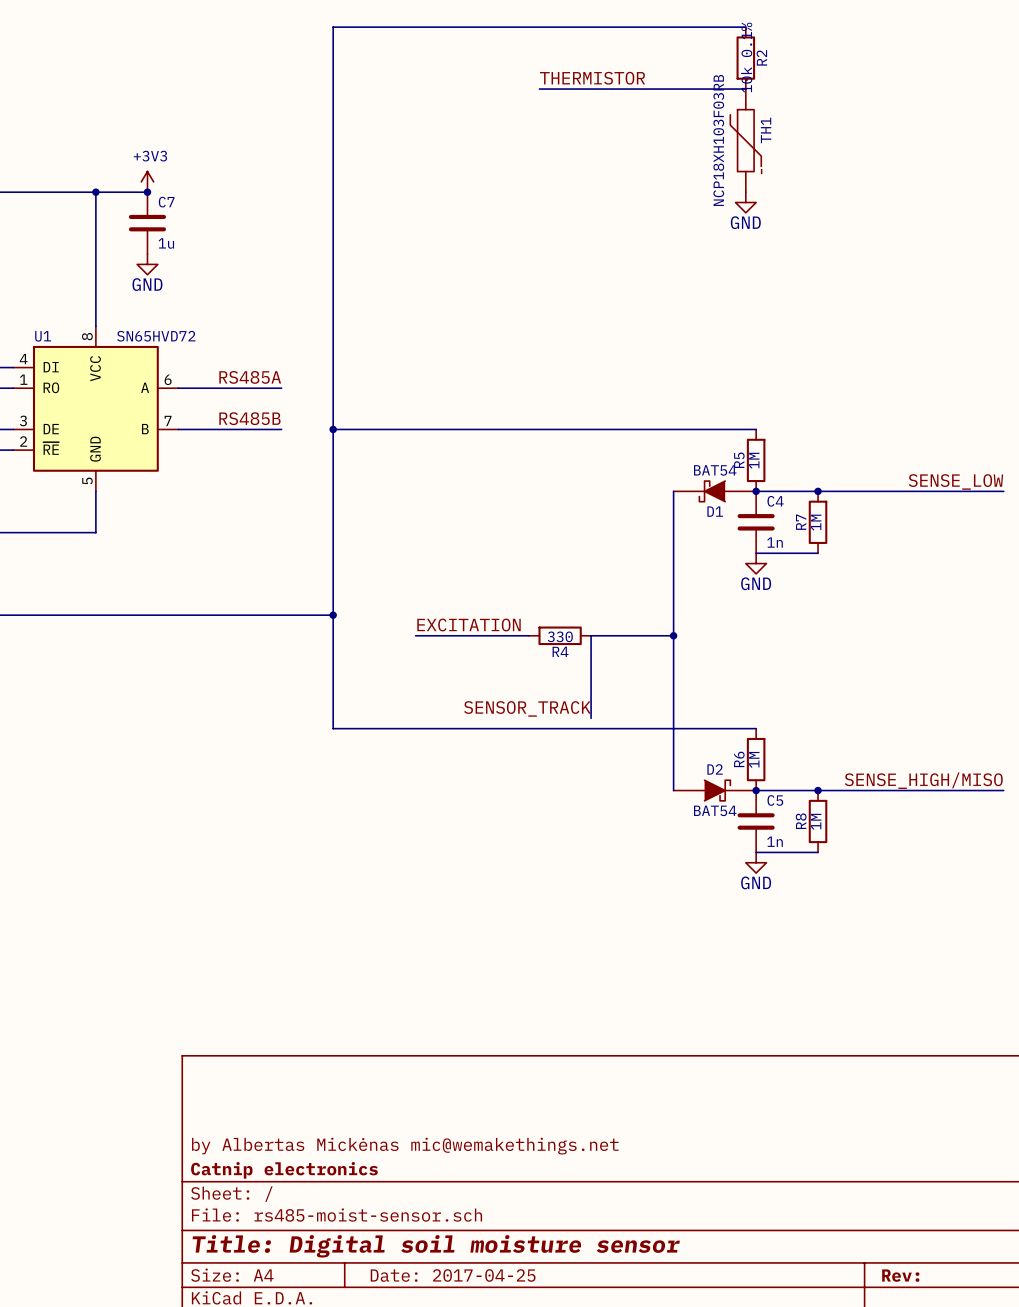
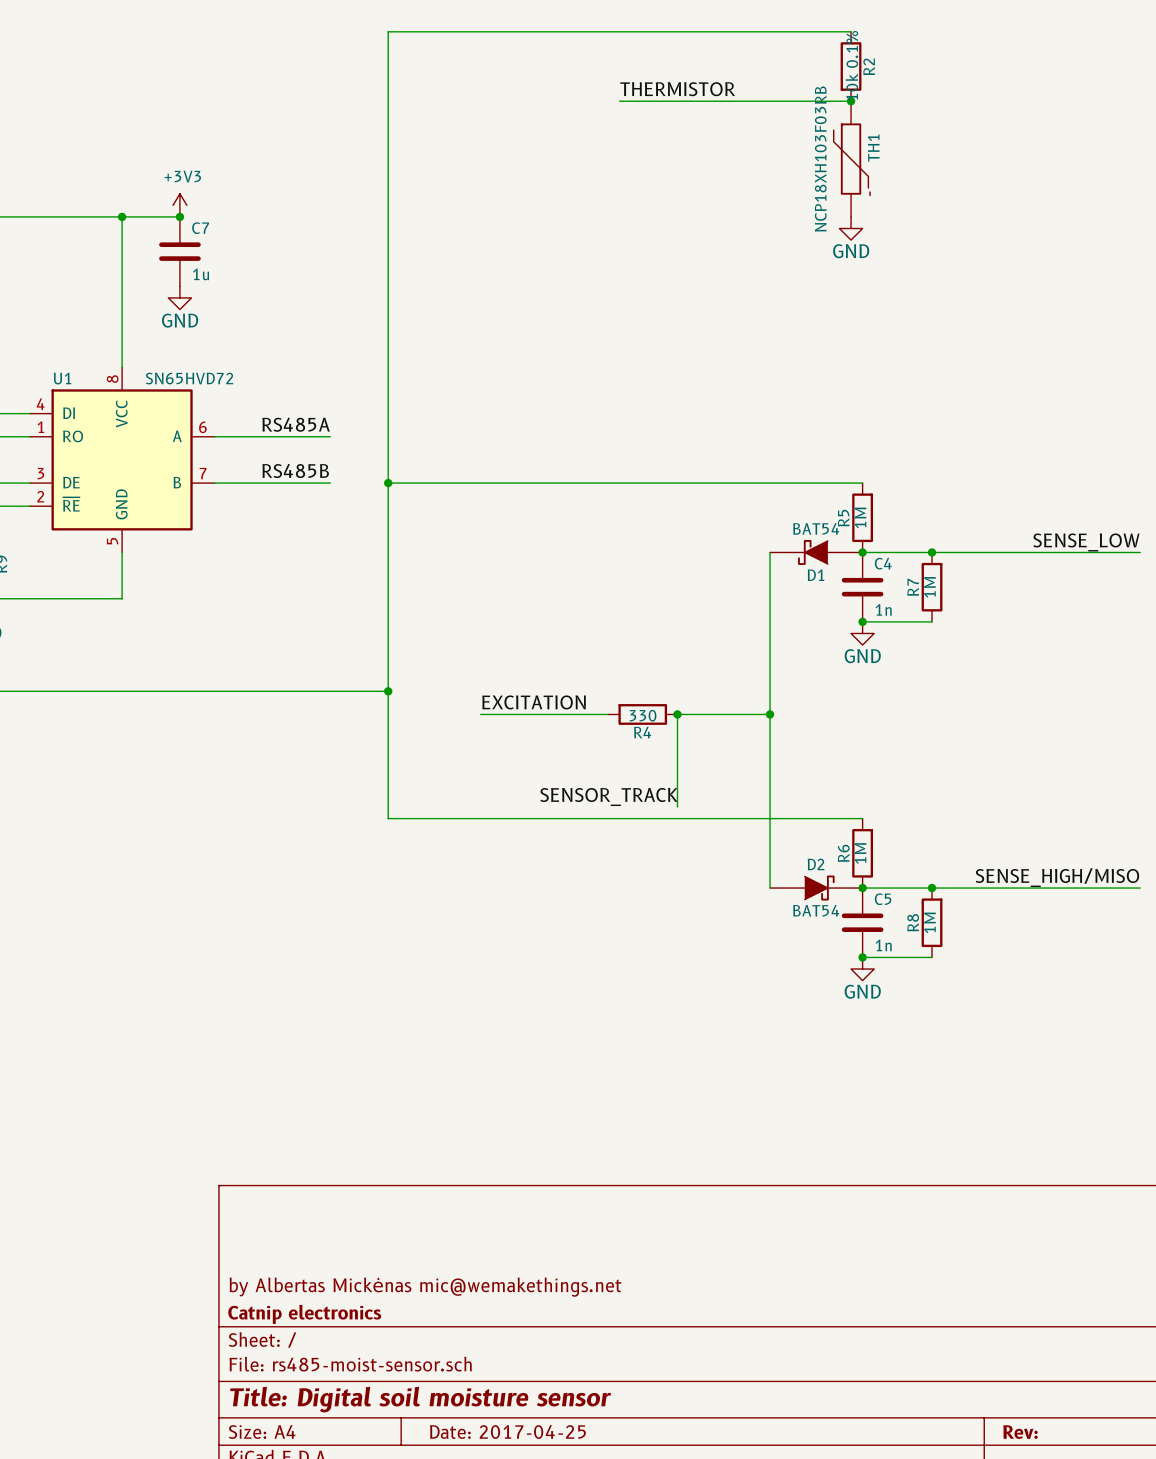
junction: none -> (851, 101)
junction: none -> (862, 621)
junction: none -> (677, 714)
junction: none -> (862, 957)

